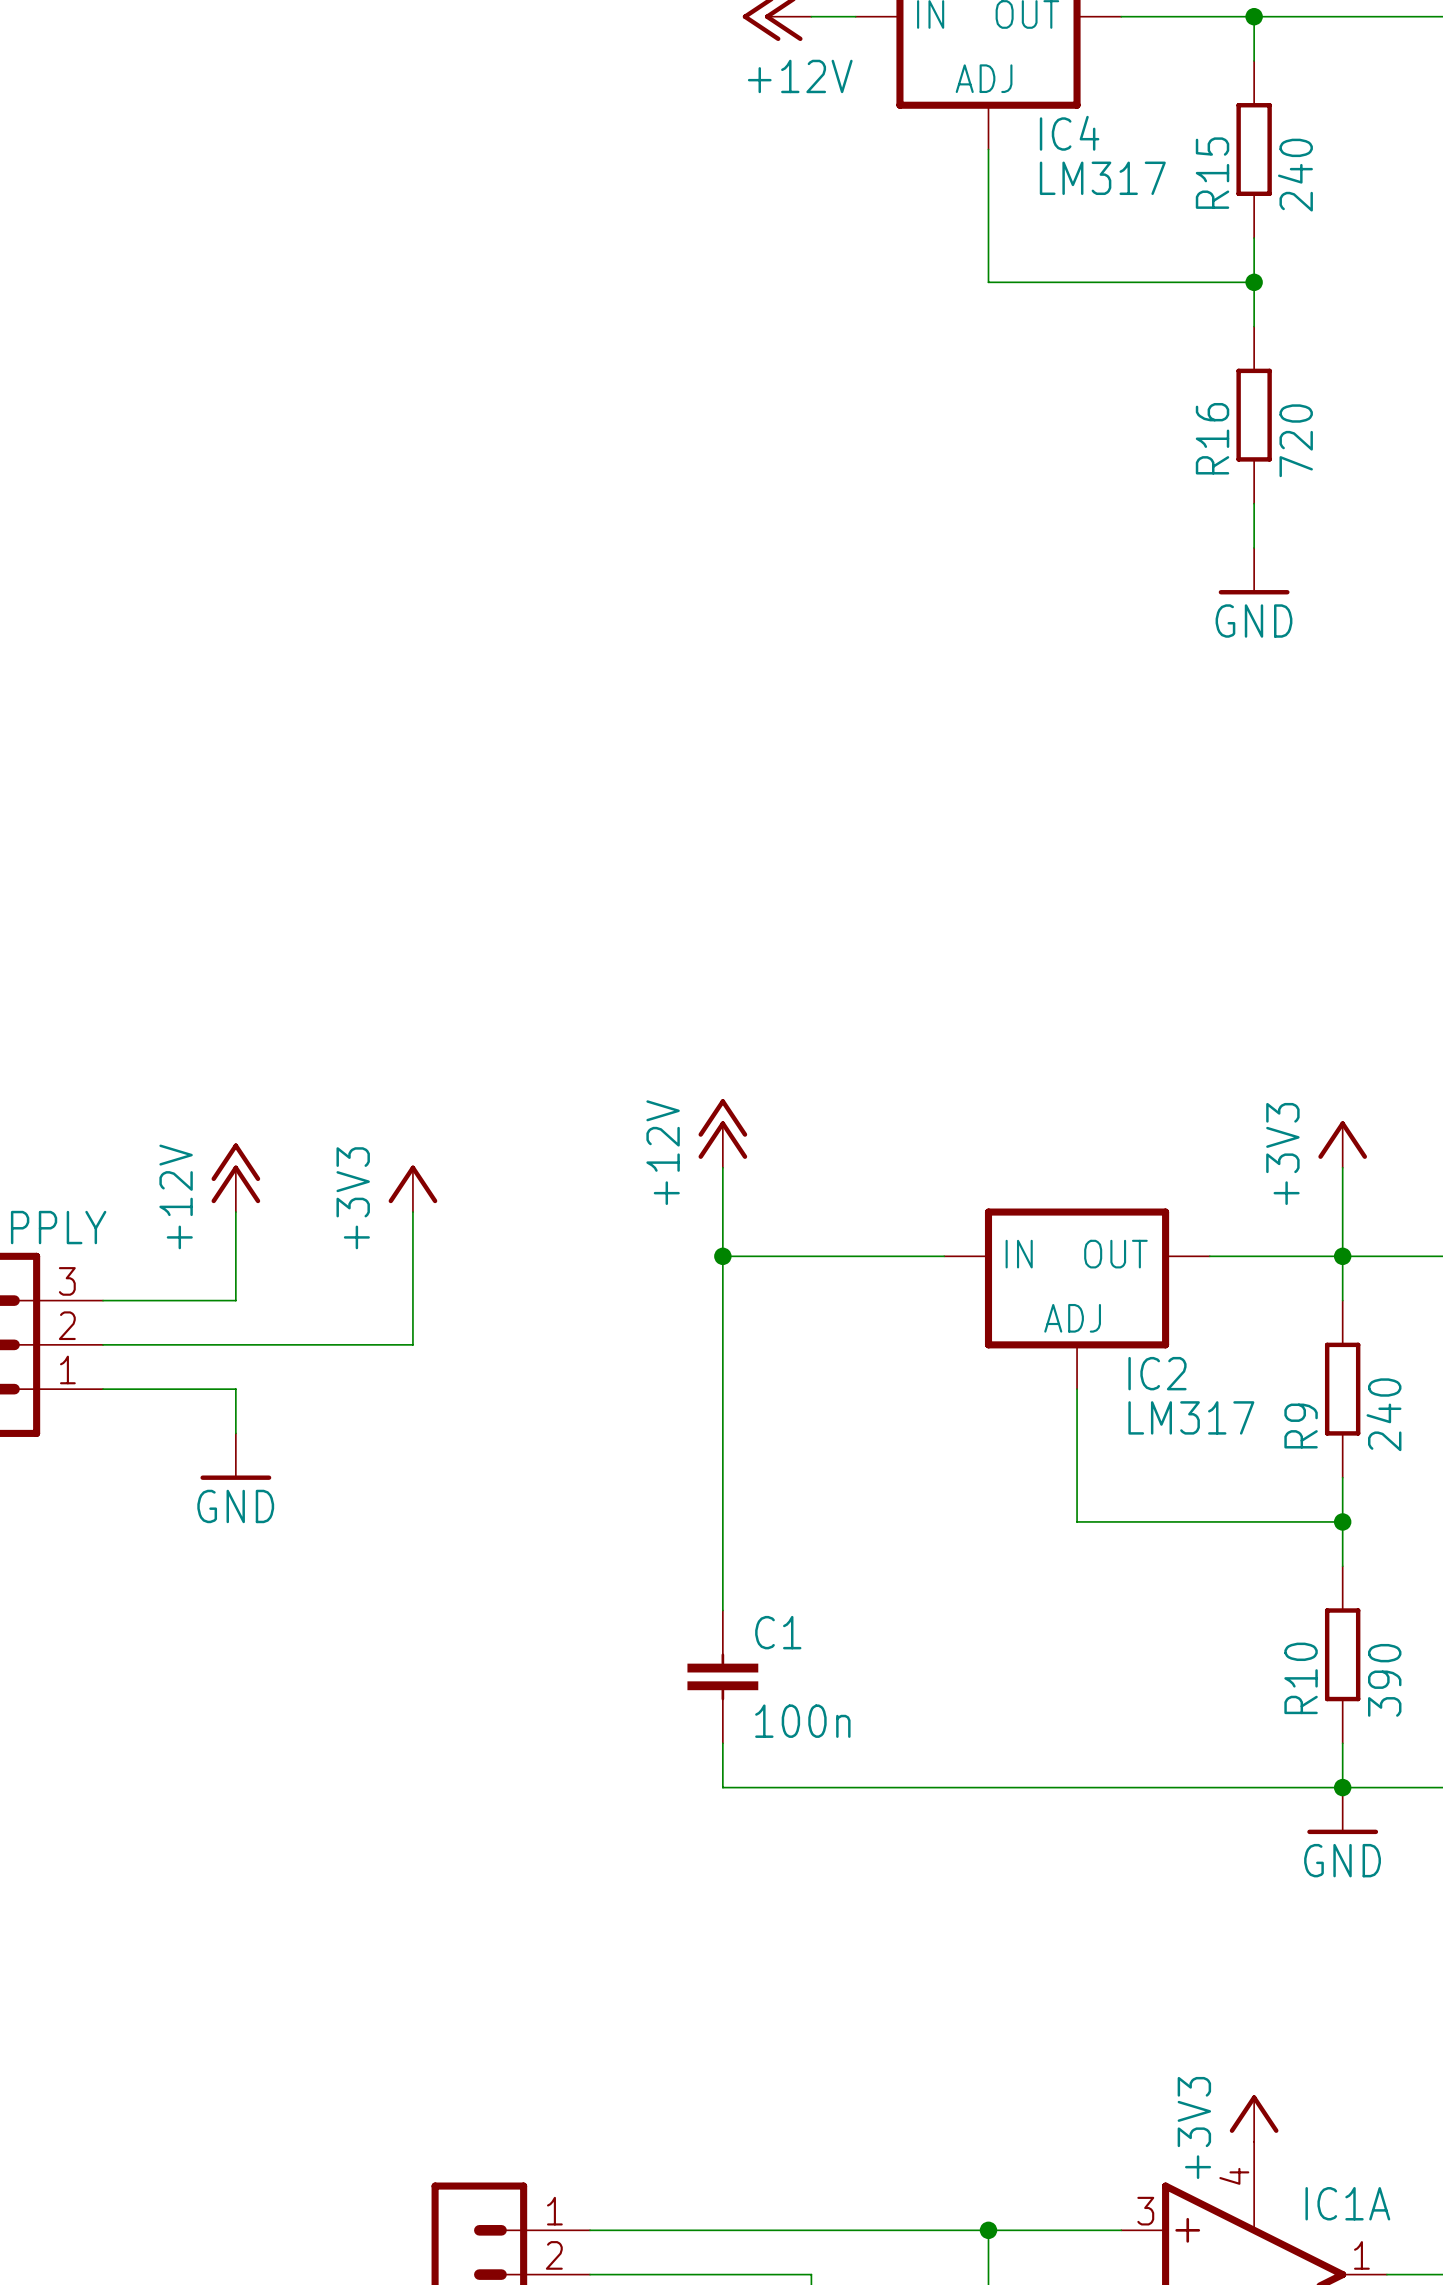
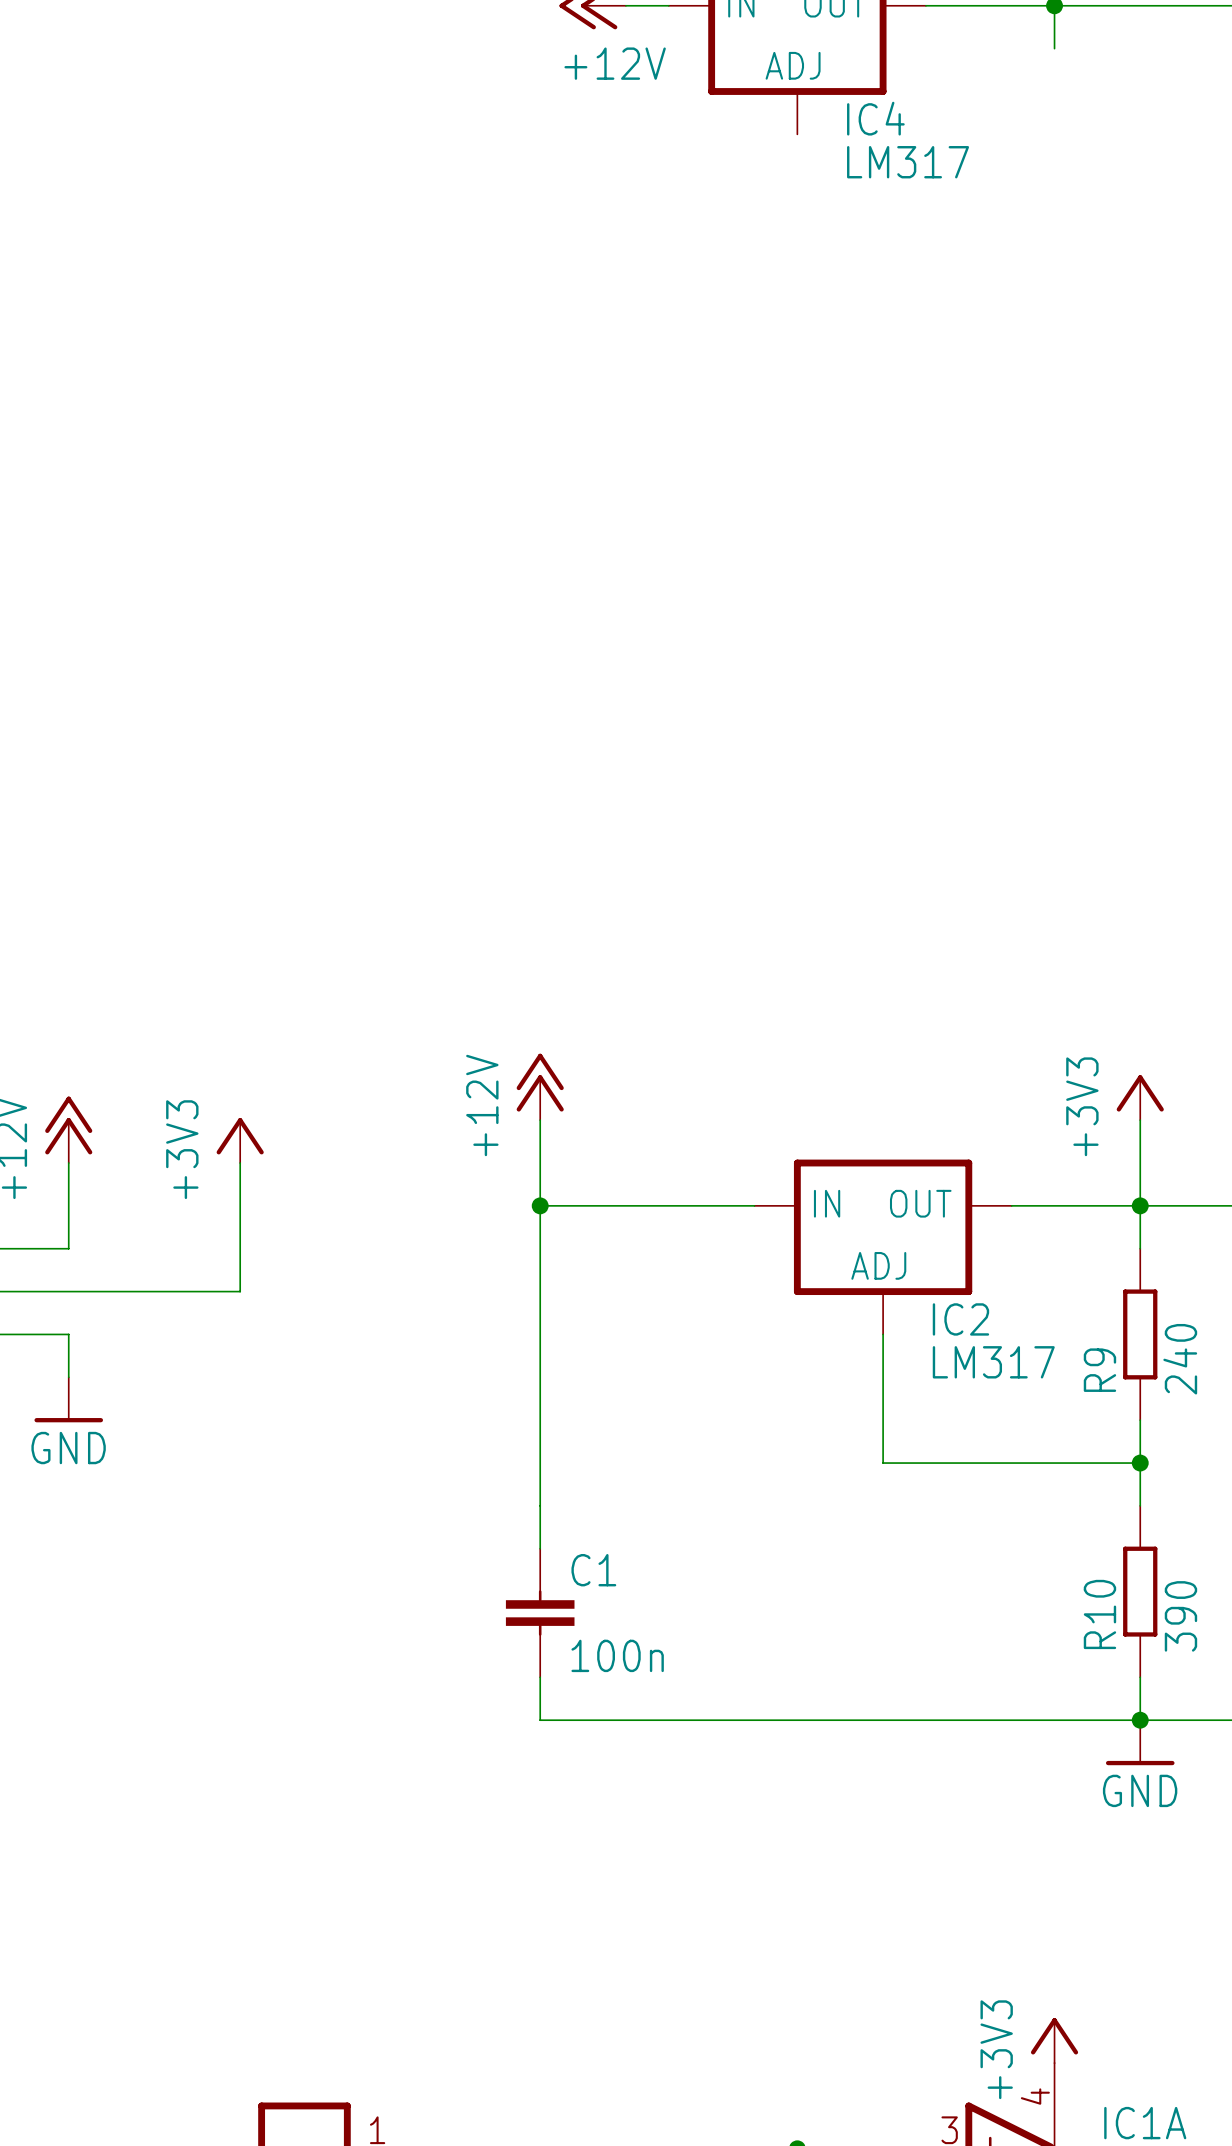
wire: (988, 149) (988, 282) (1254, 282) -> none
R15: 240 (1254, 149) -> none
wire: (1254, 238) (1254, 326) -> none
junction: (1254, 282) -> none
R16: 720 (1254, 415) -> none
wire: (1254, 503) (1254, 547) -> none
power symbol: GND (1254, 571) -> none

